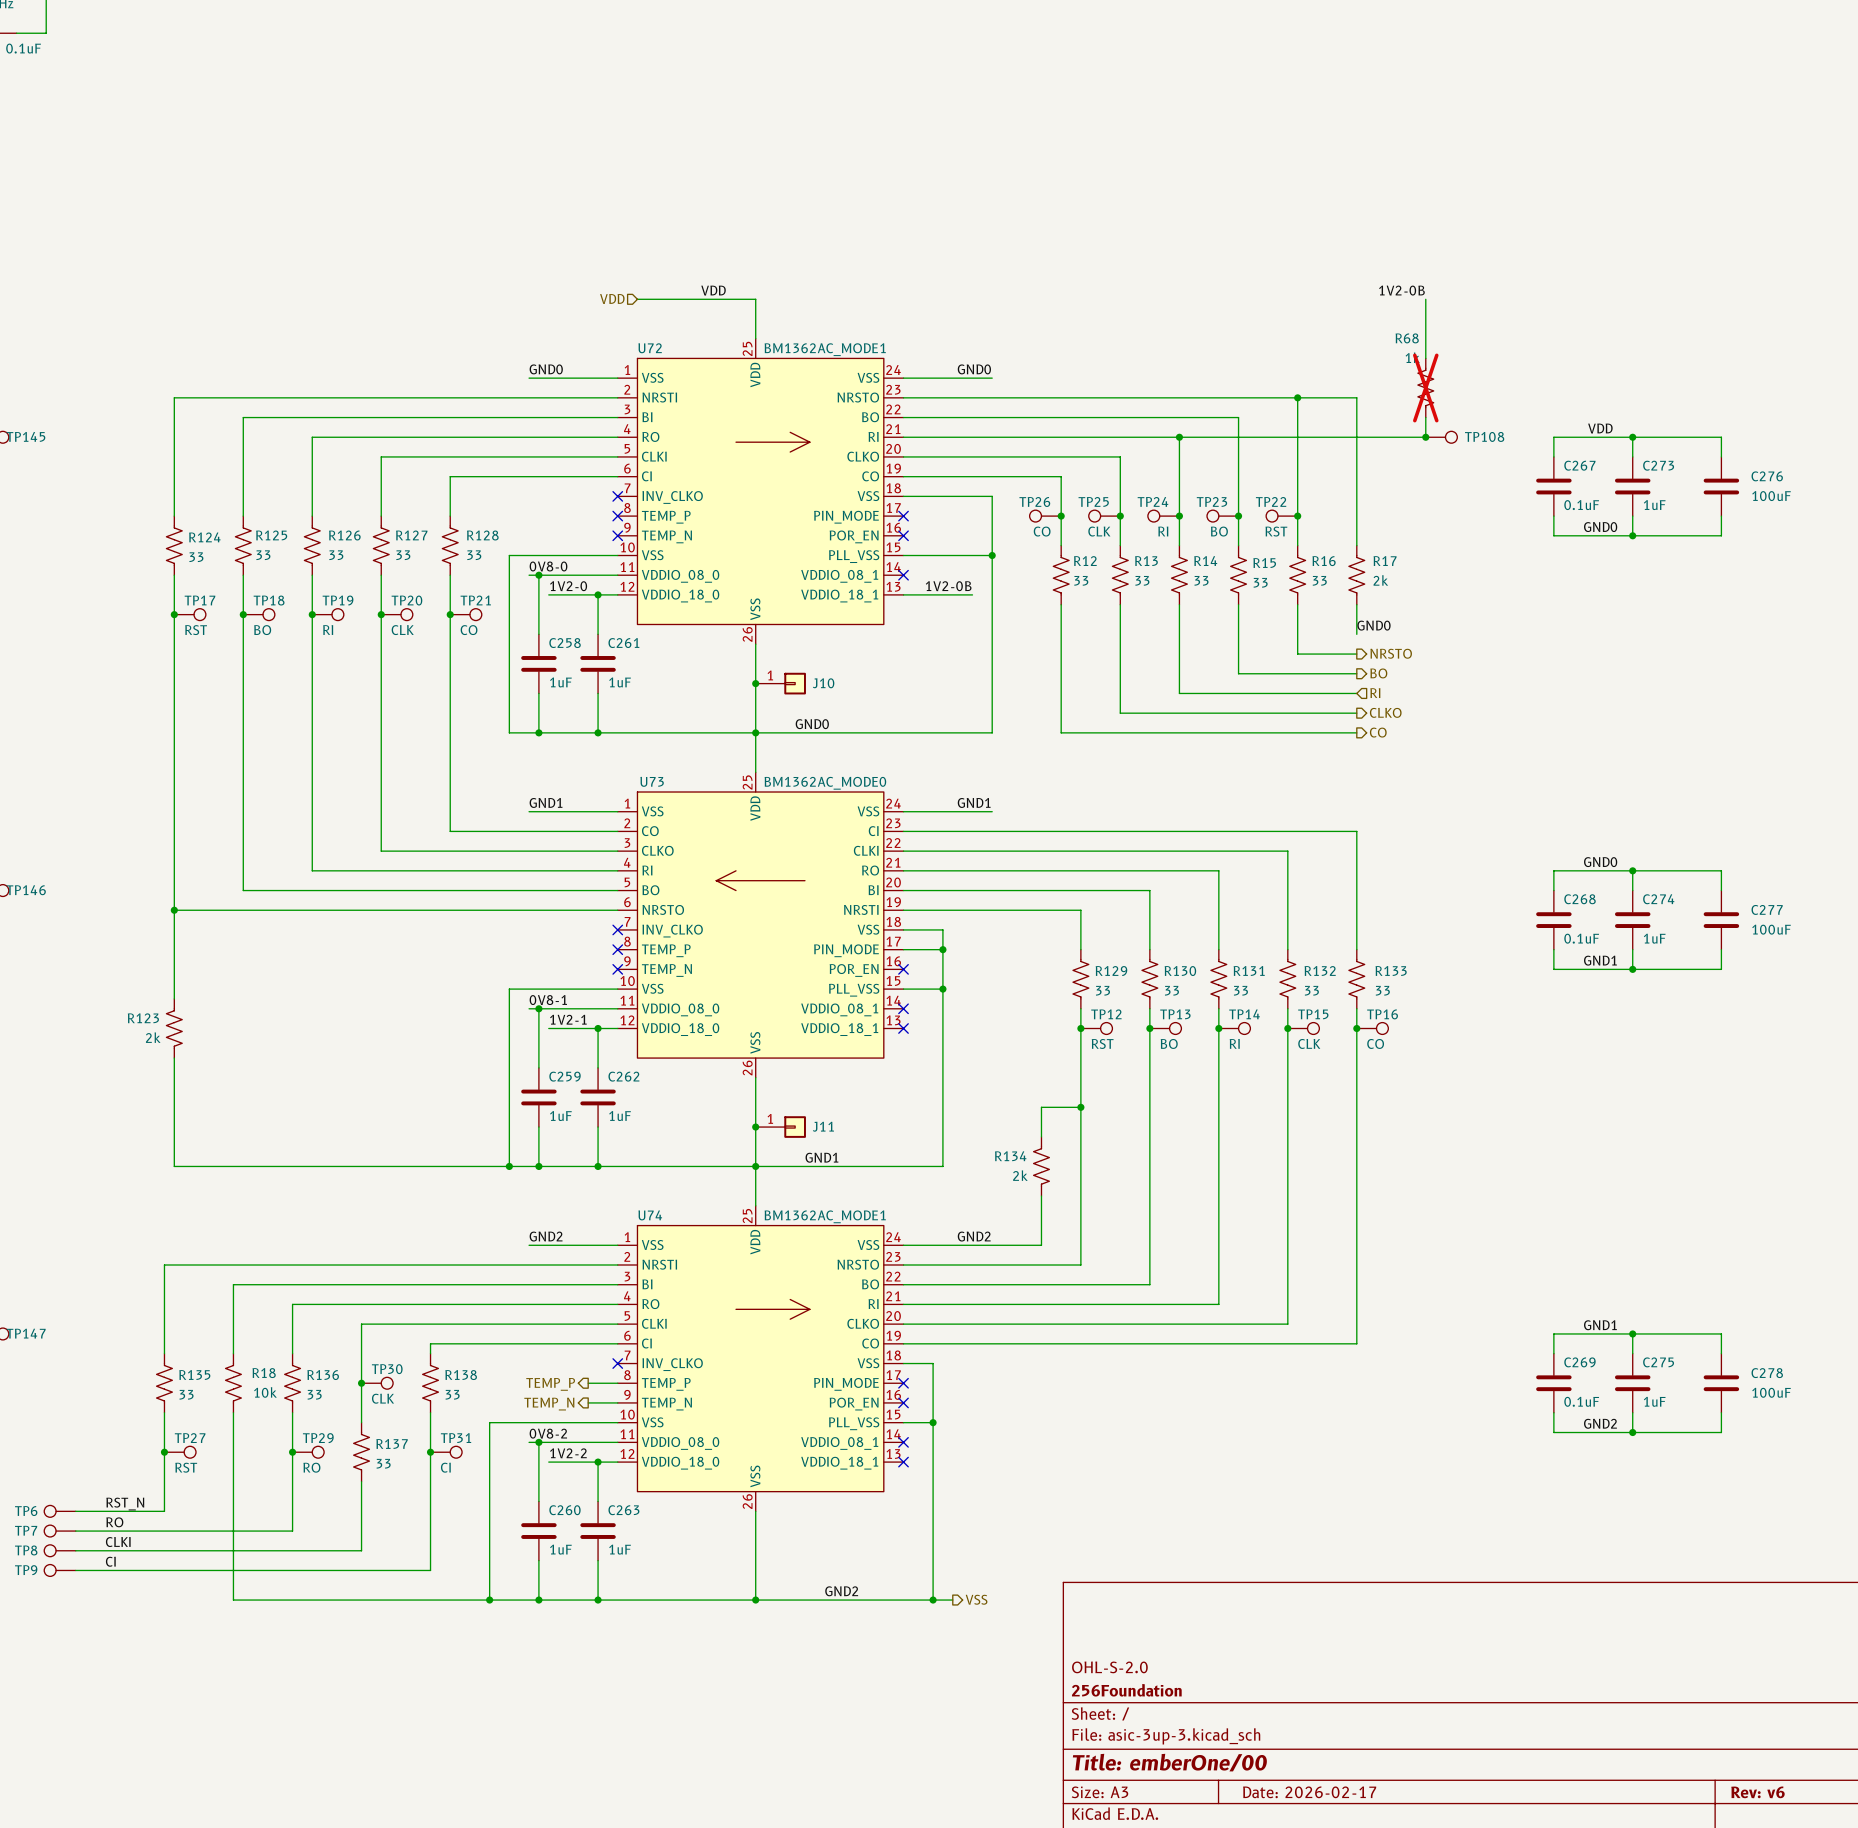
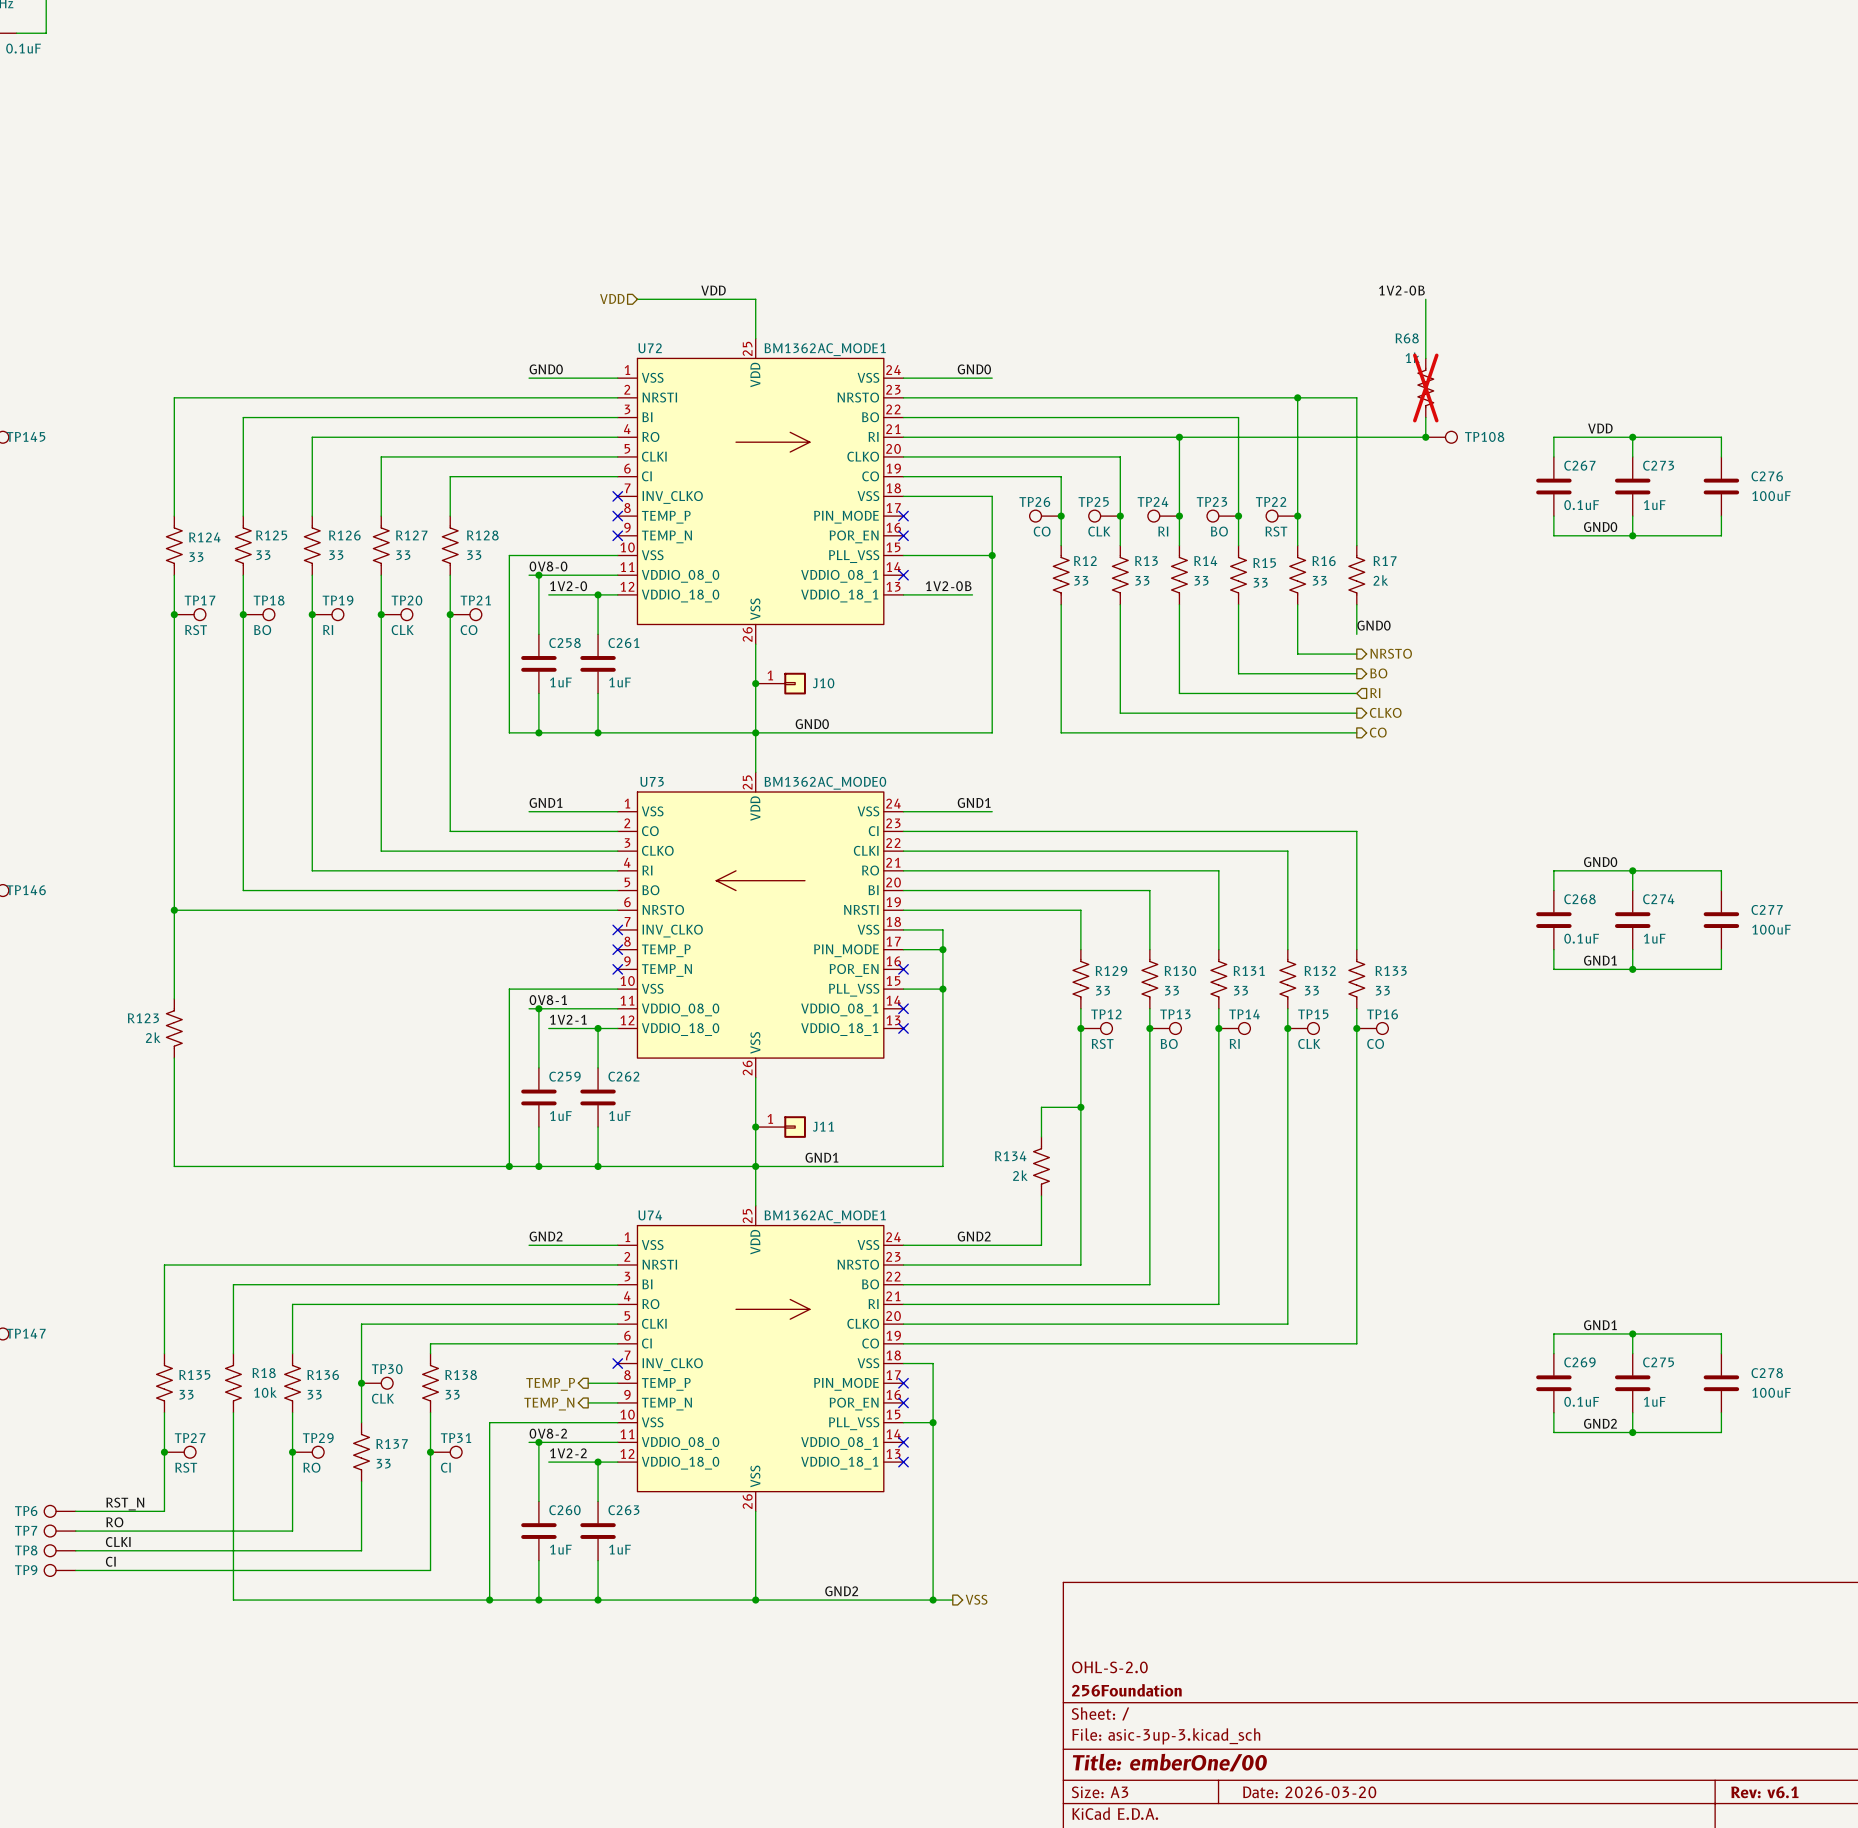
title block: Date: 2026-02-17 (1309, 1792) -> Date: 2026-03-20 (1309, 1792)
title block: Rev: v6 (1757, 1792) -> Rev: v6.1 (1764, 1792)

